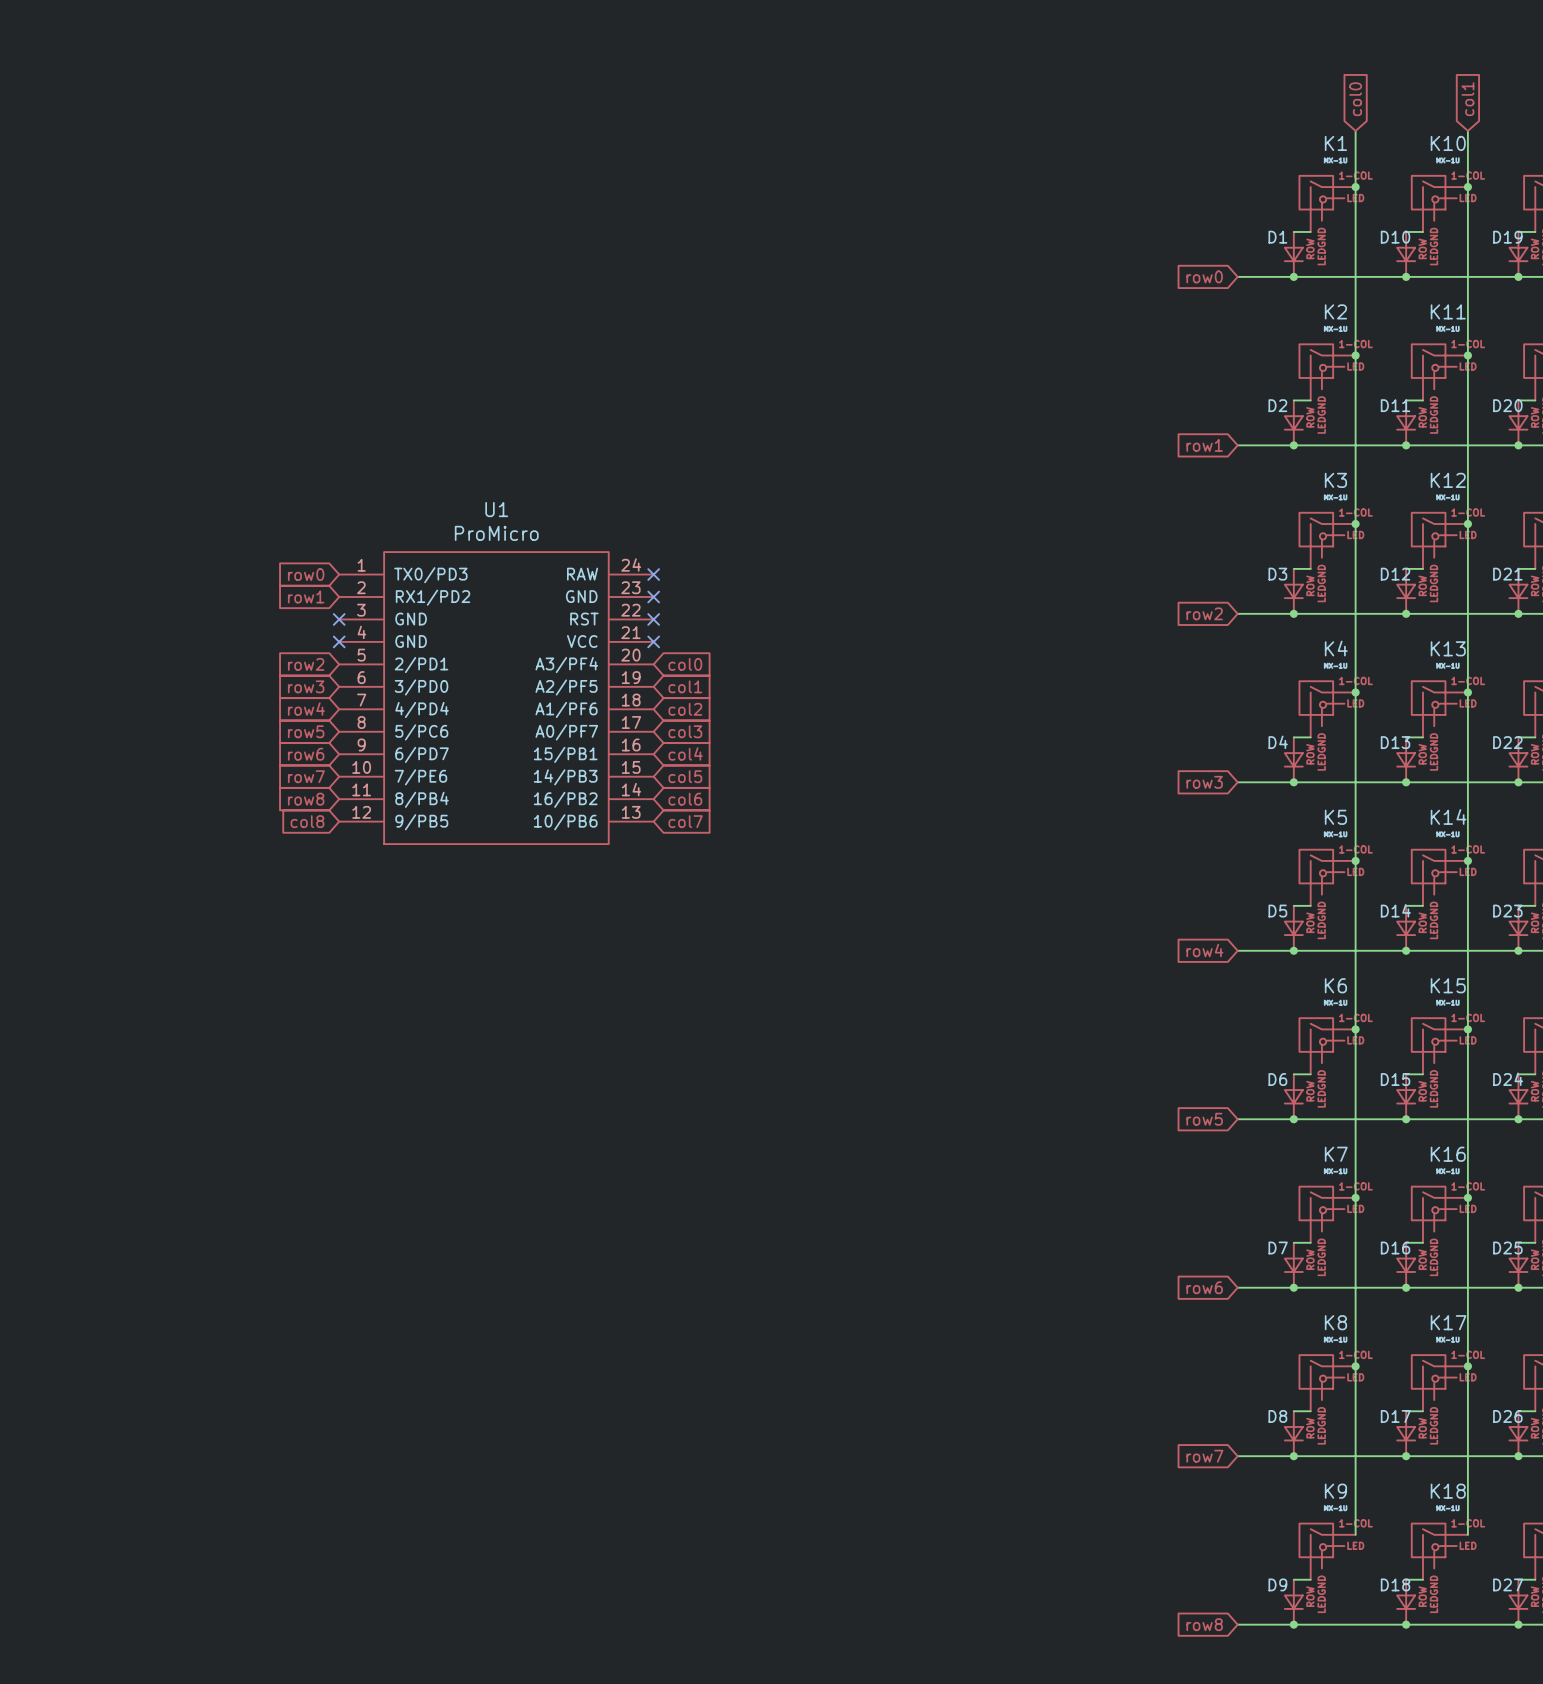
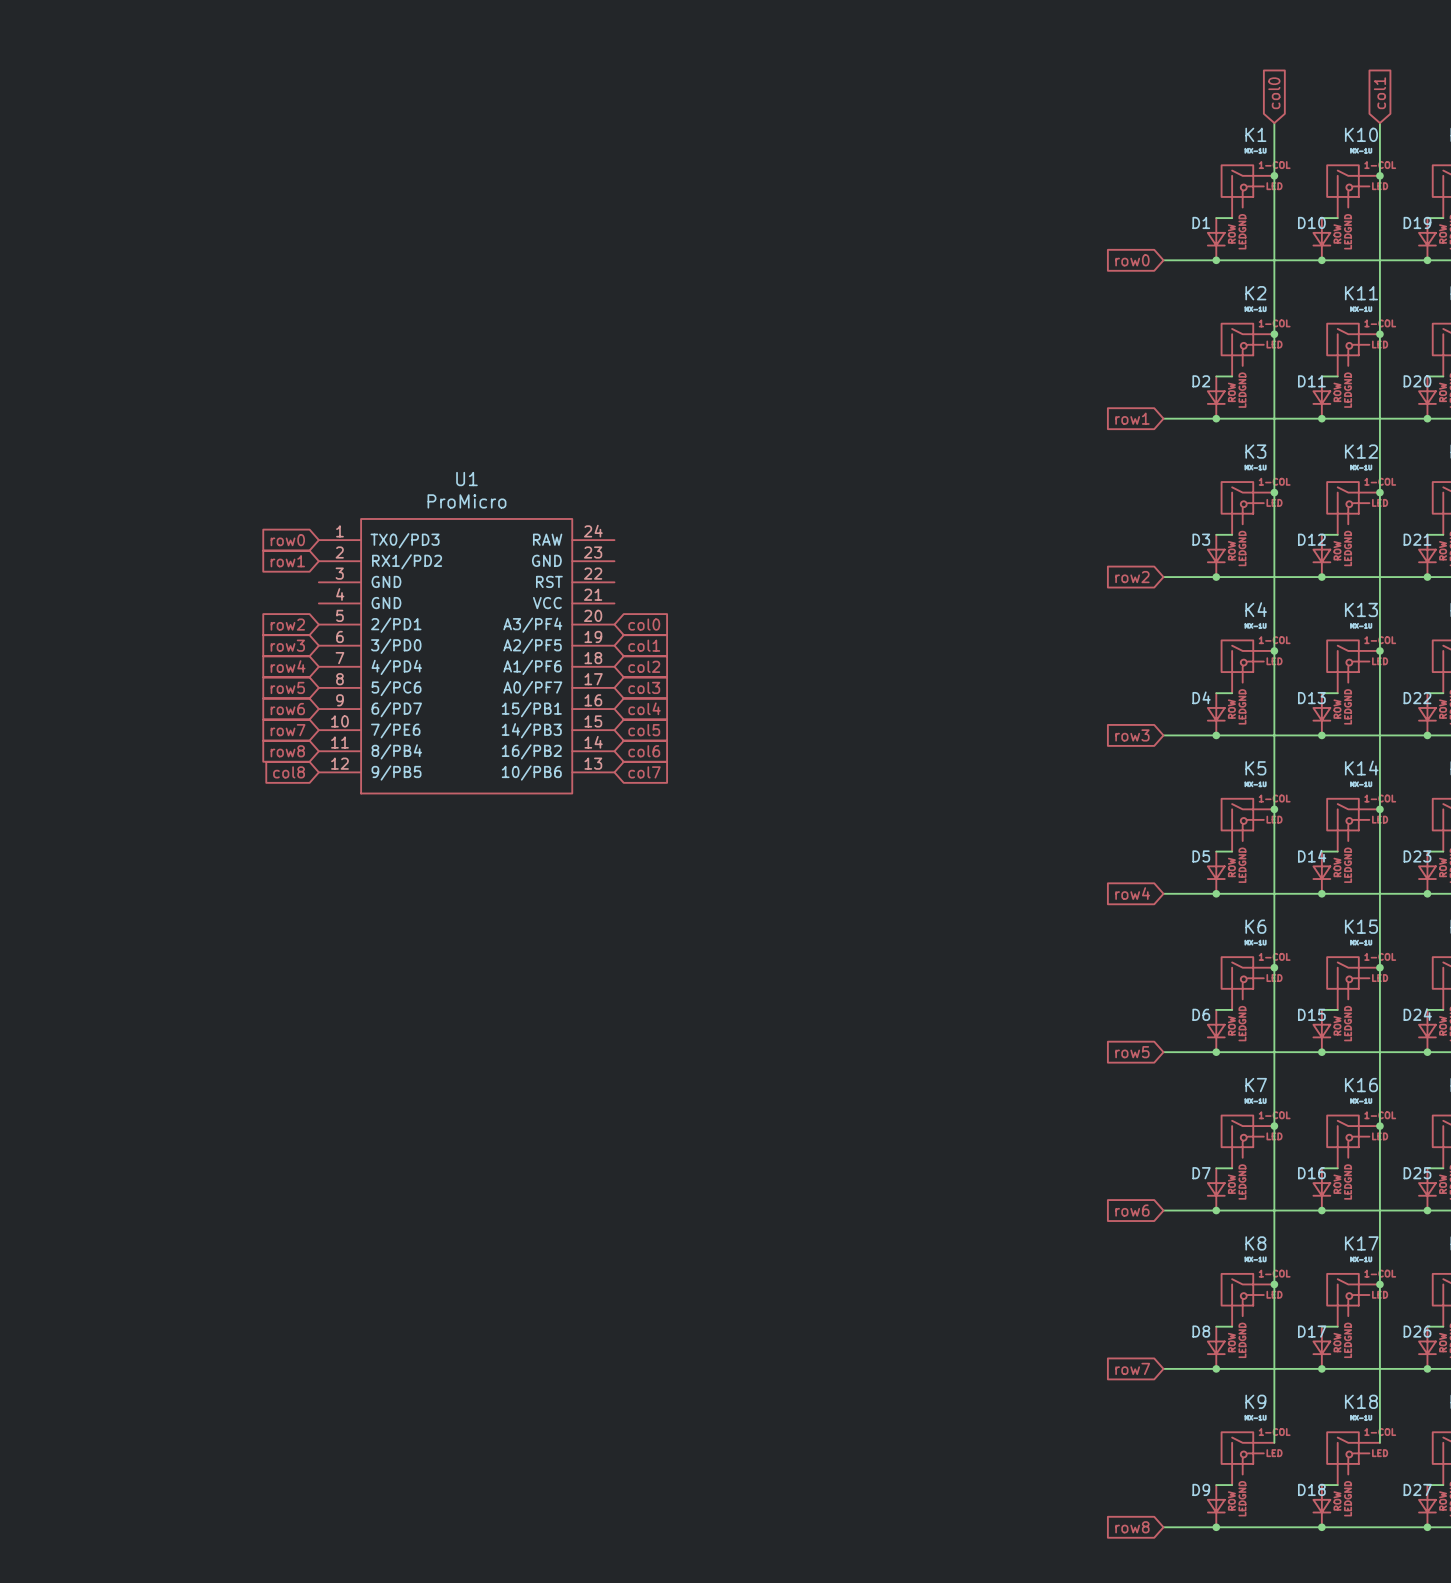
no-connect mark: (653, 574) -> none
no-connect mark: (653, 597) -> none
no-connect mark: (339, 619) -> none
no-connect mark: (653, 619) -> none
no-connect mark: (339, 641) -> none
no-connect mark: (653, 641) -> none

